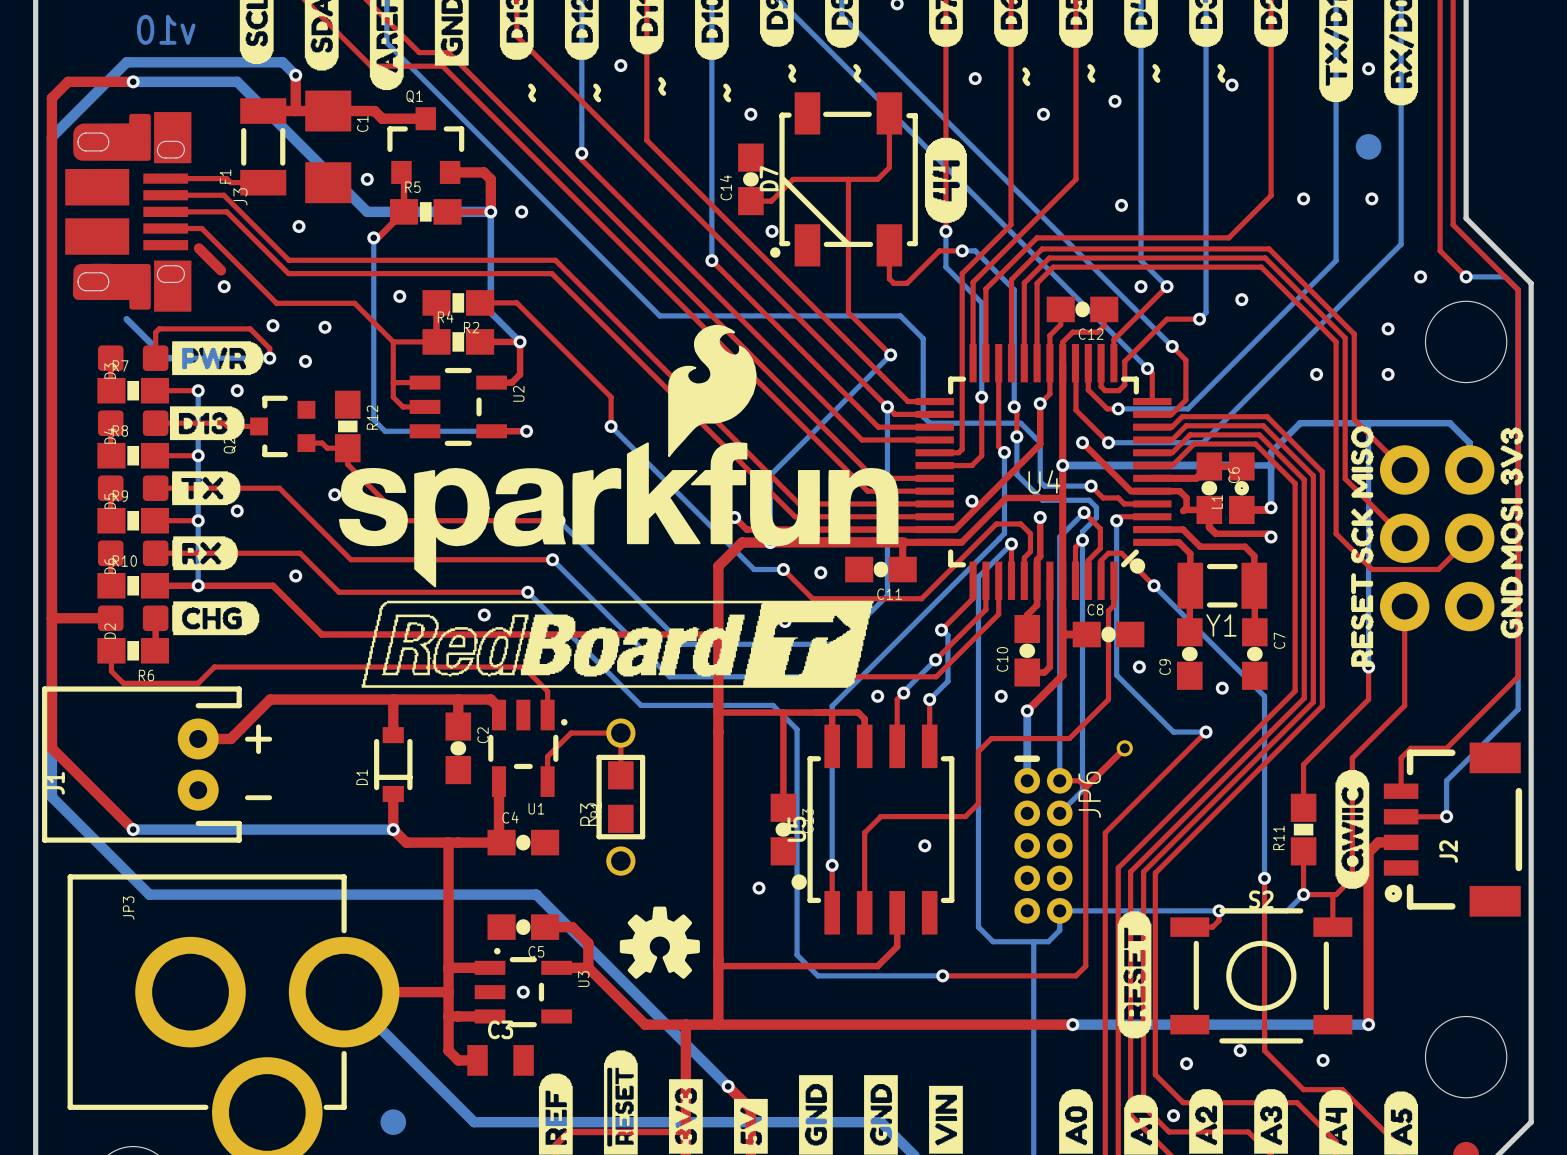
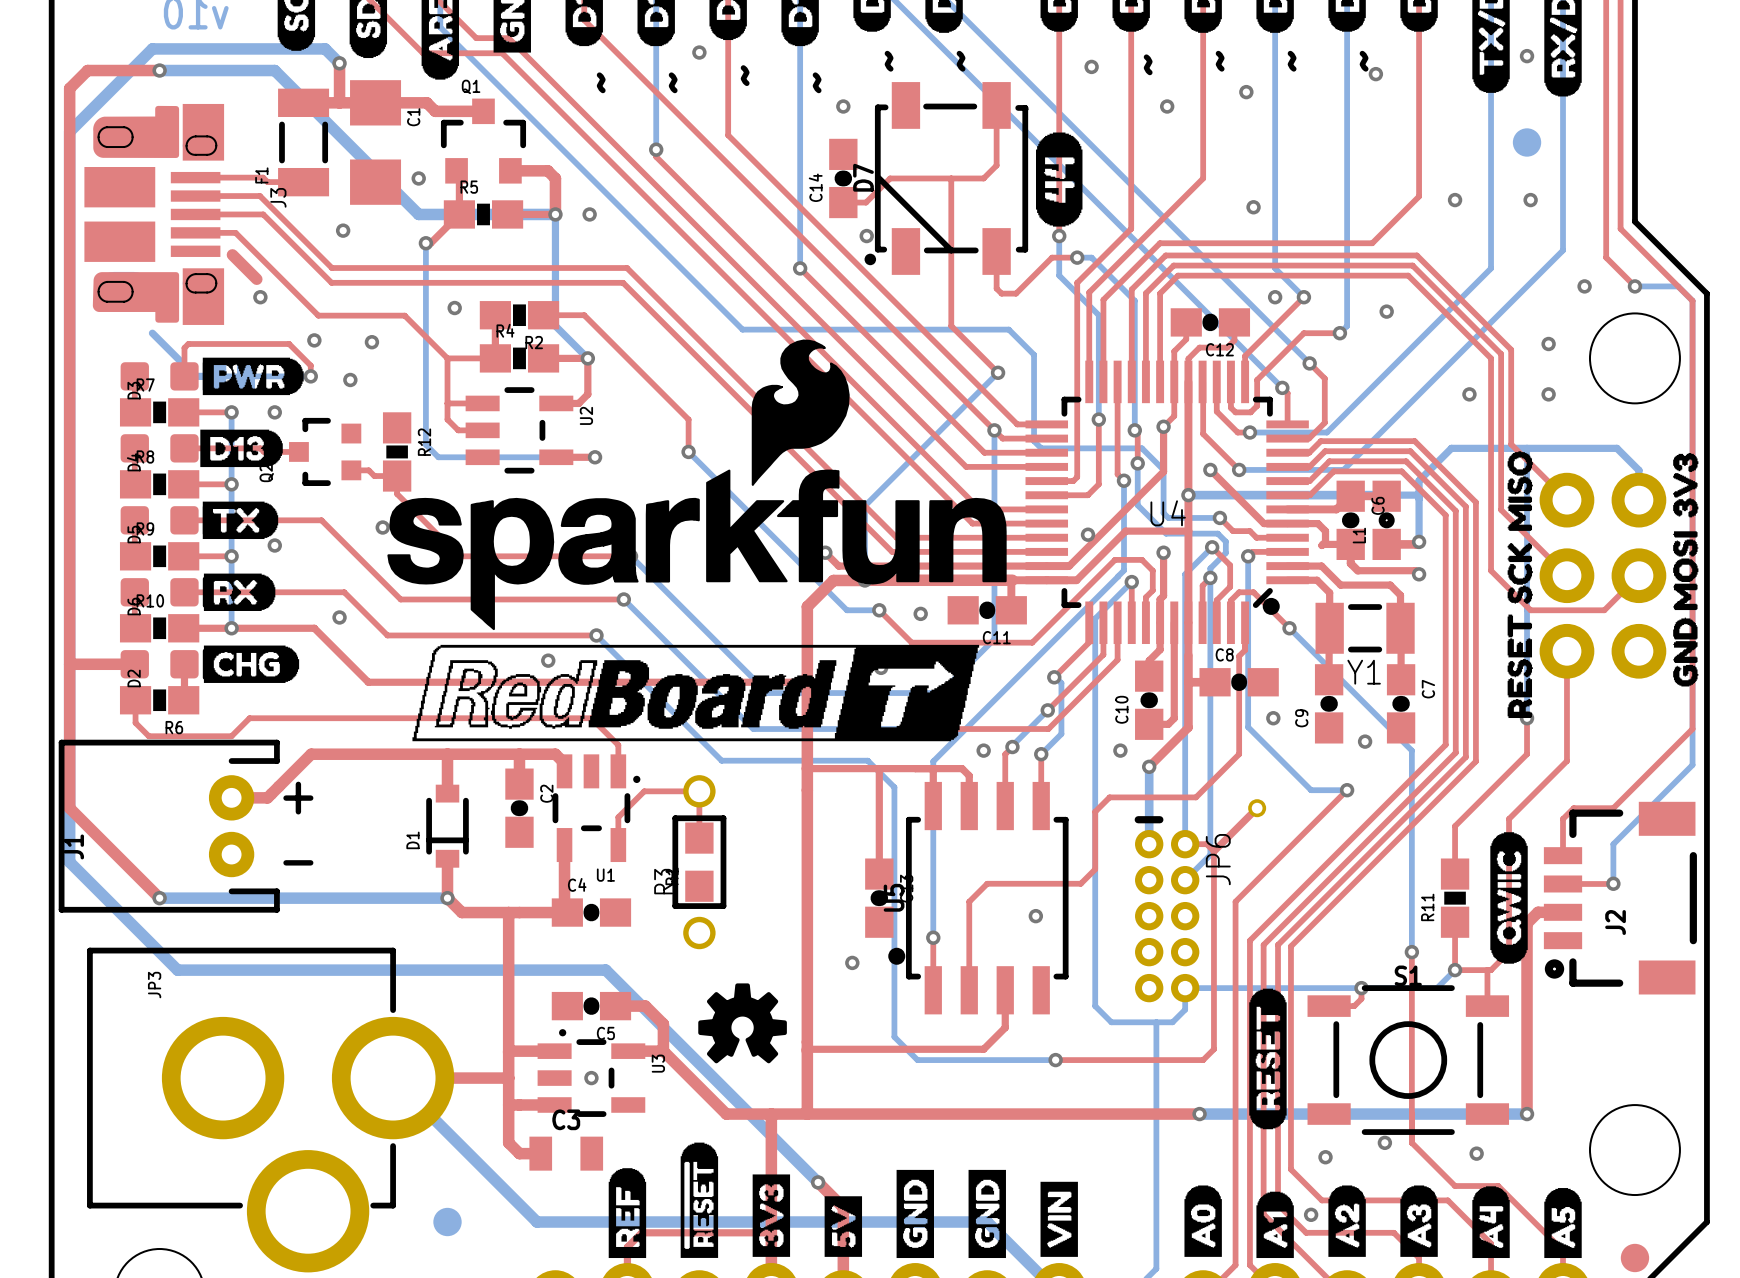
S2 name: S2 (1261, 899) -> S1 (1408, 975)

